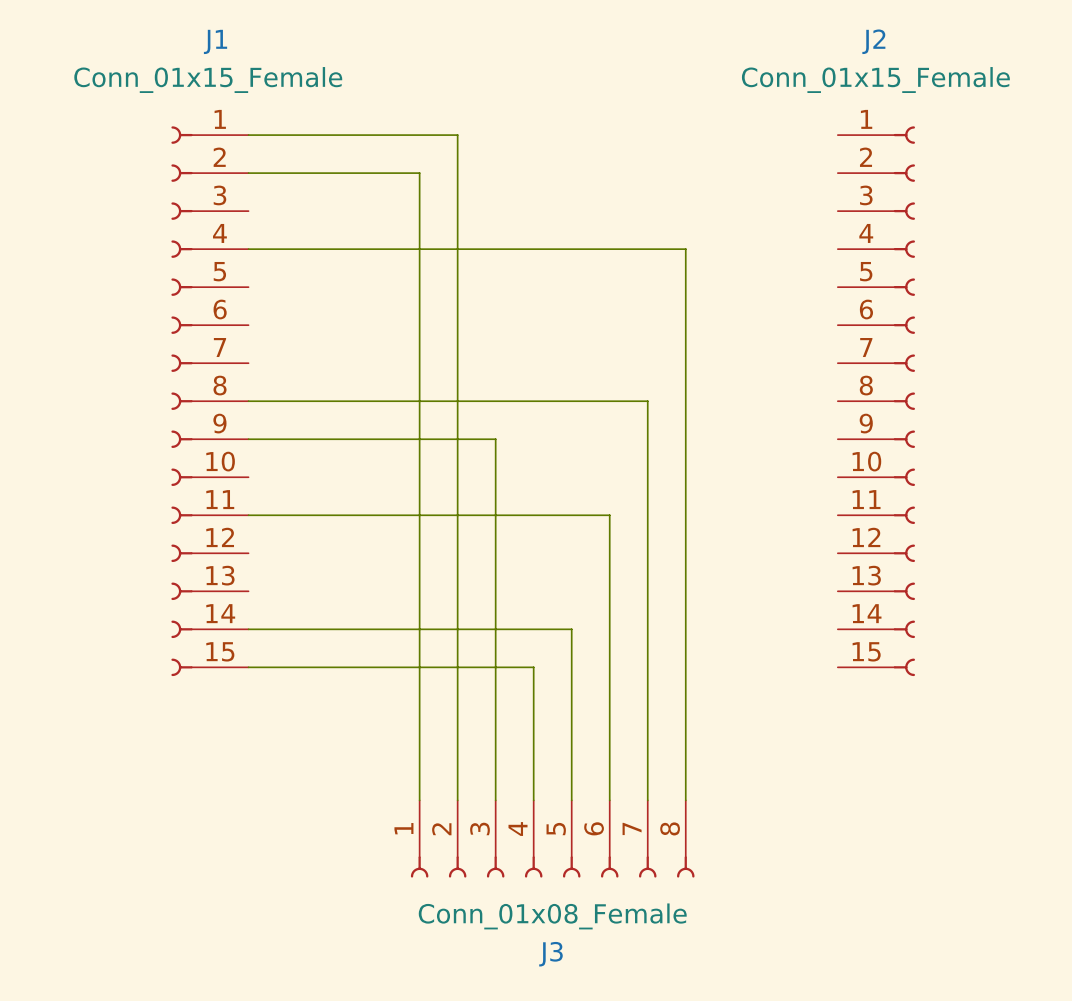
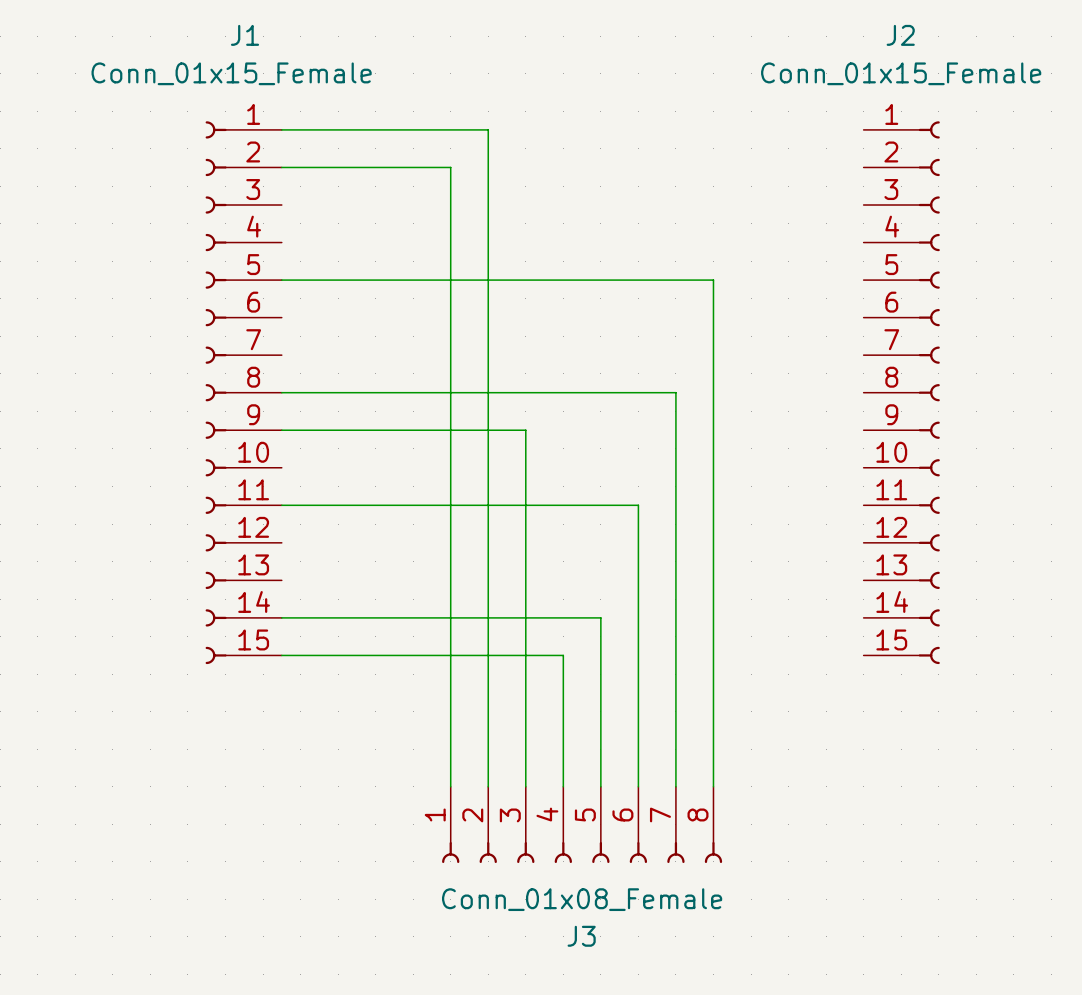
wire: (248, 249) (685, 249) (685, 287) -> (281, 280) (713, 280)

